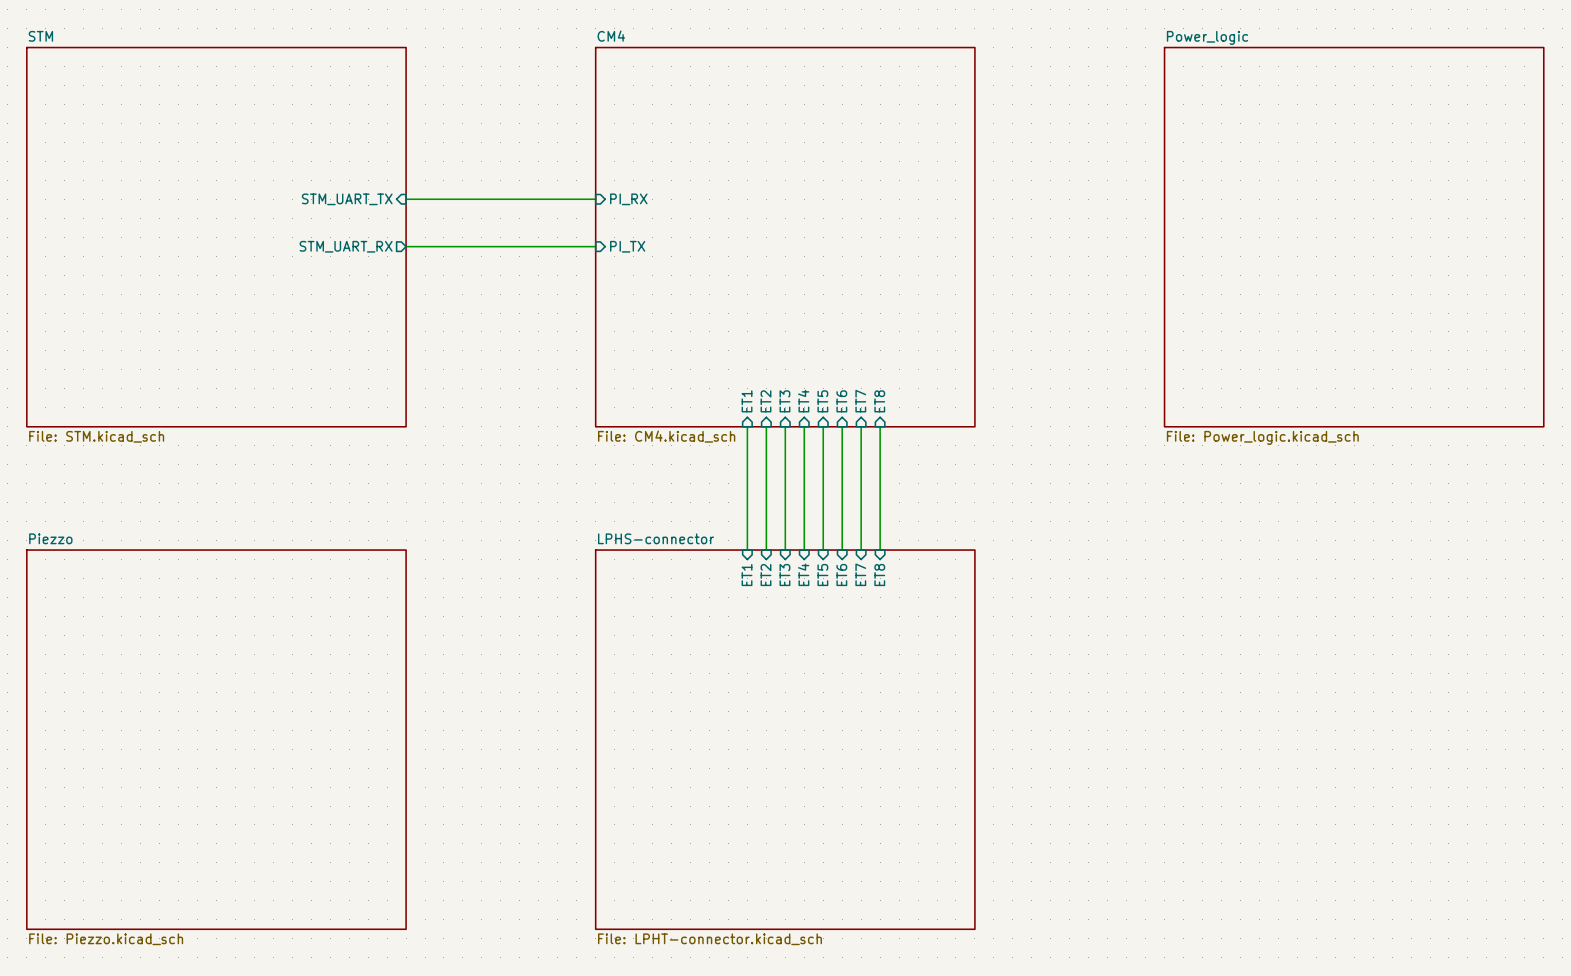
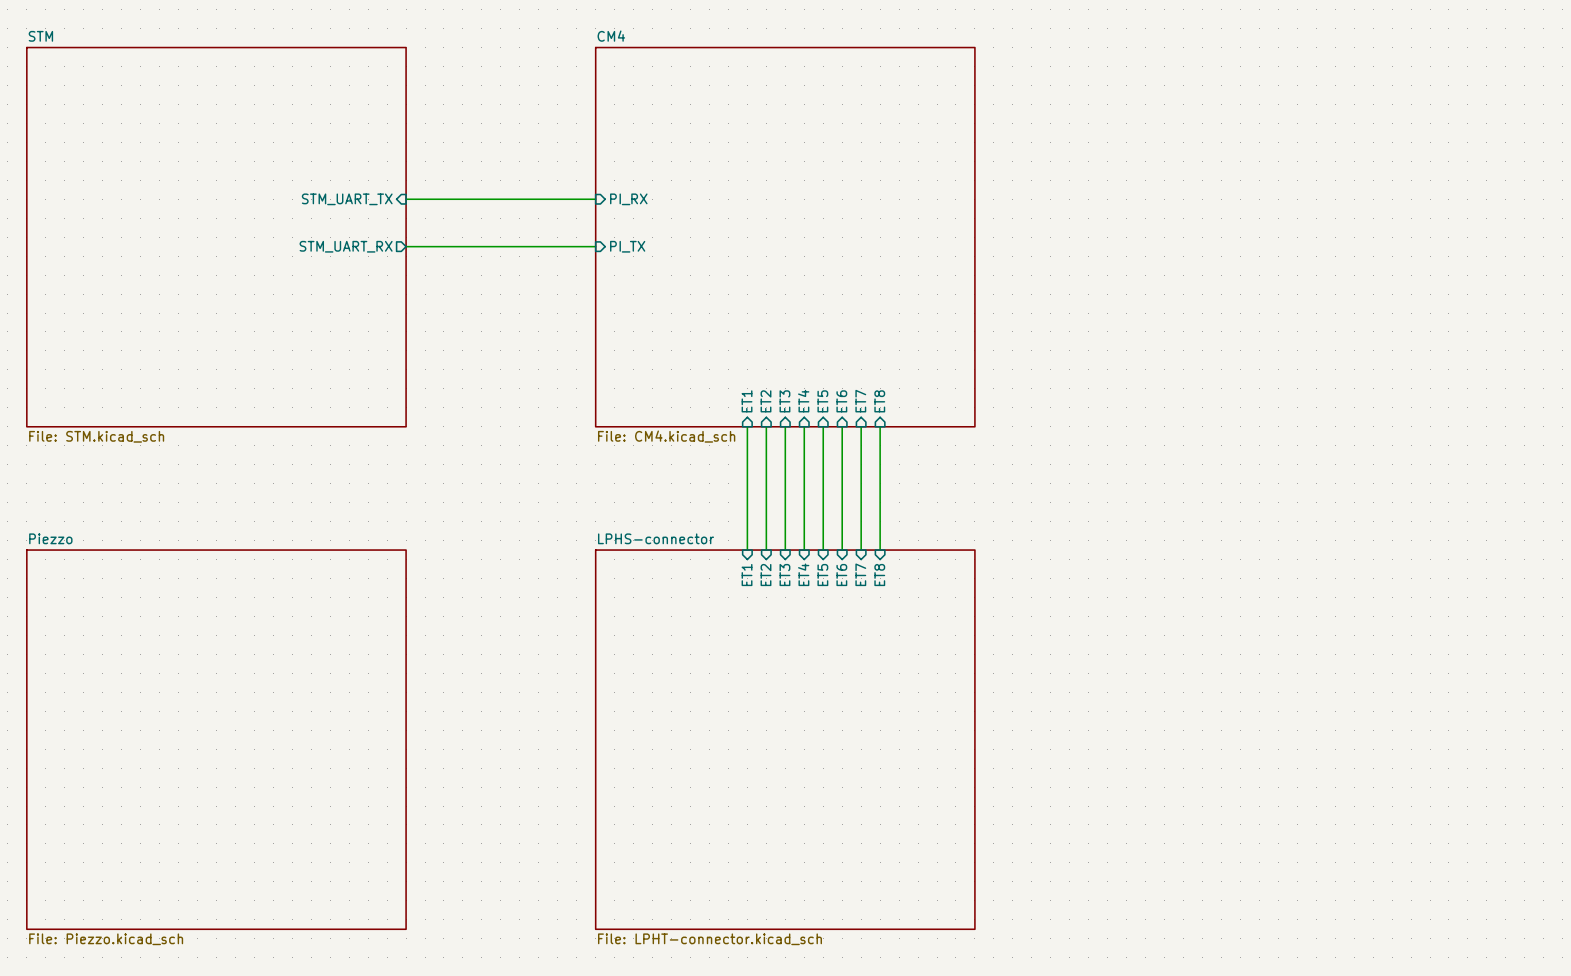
sheet Power_logic: File: Power_logic.kicad_sch (1354, 237) -> none

